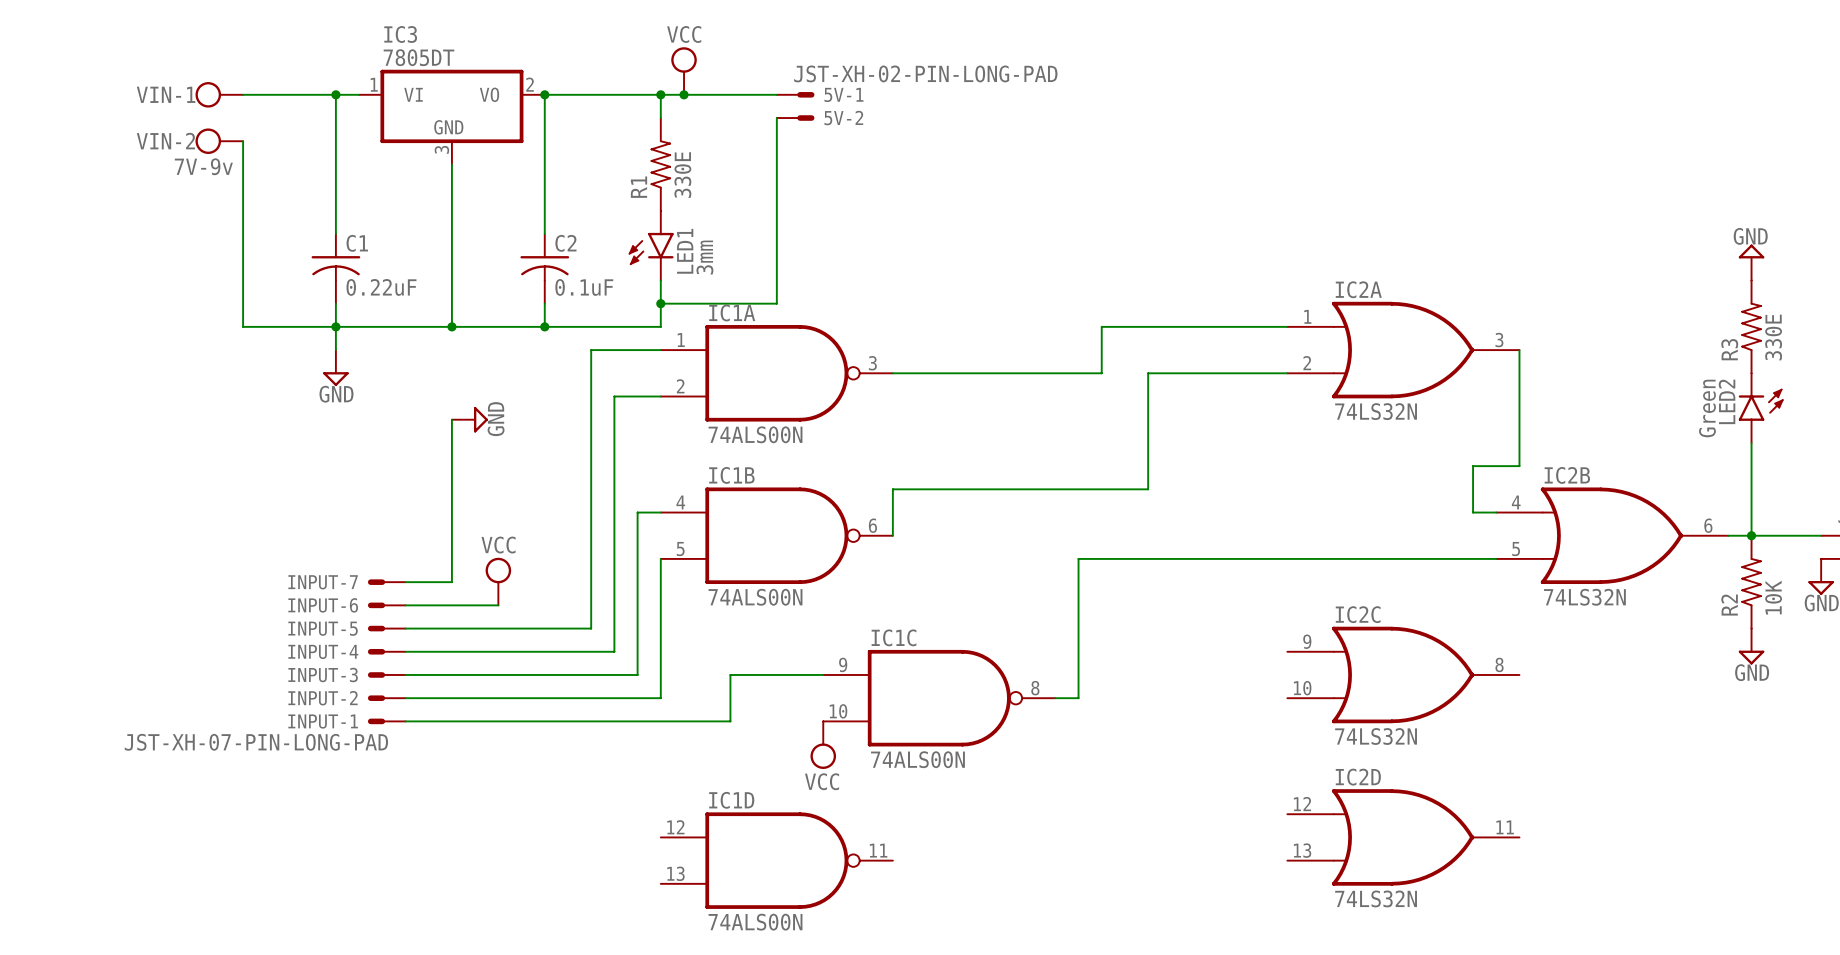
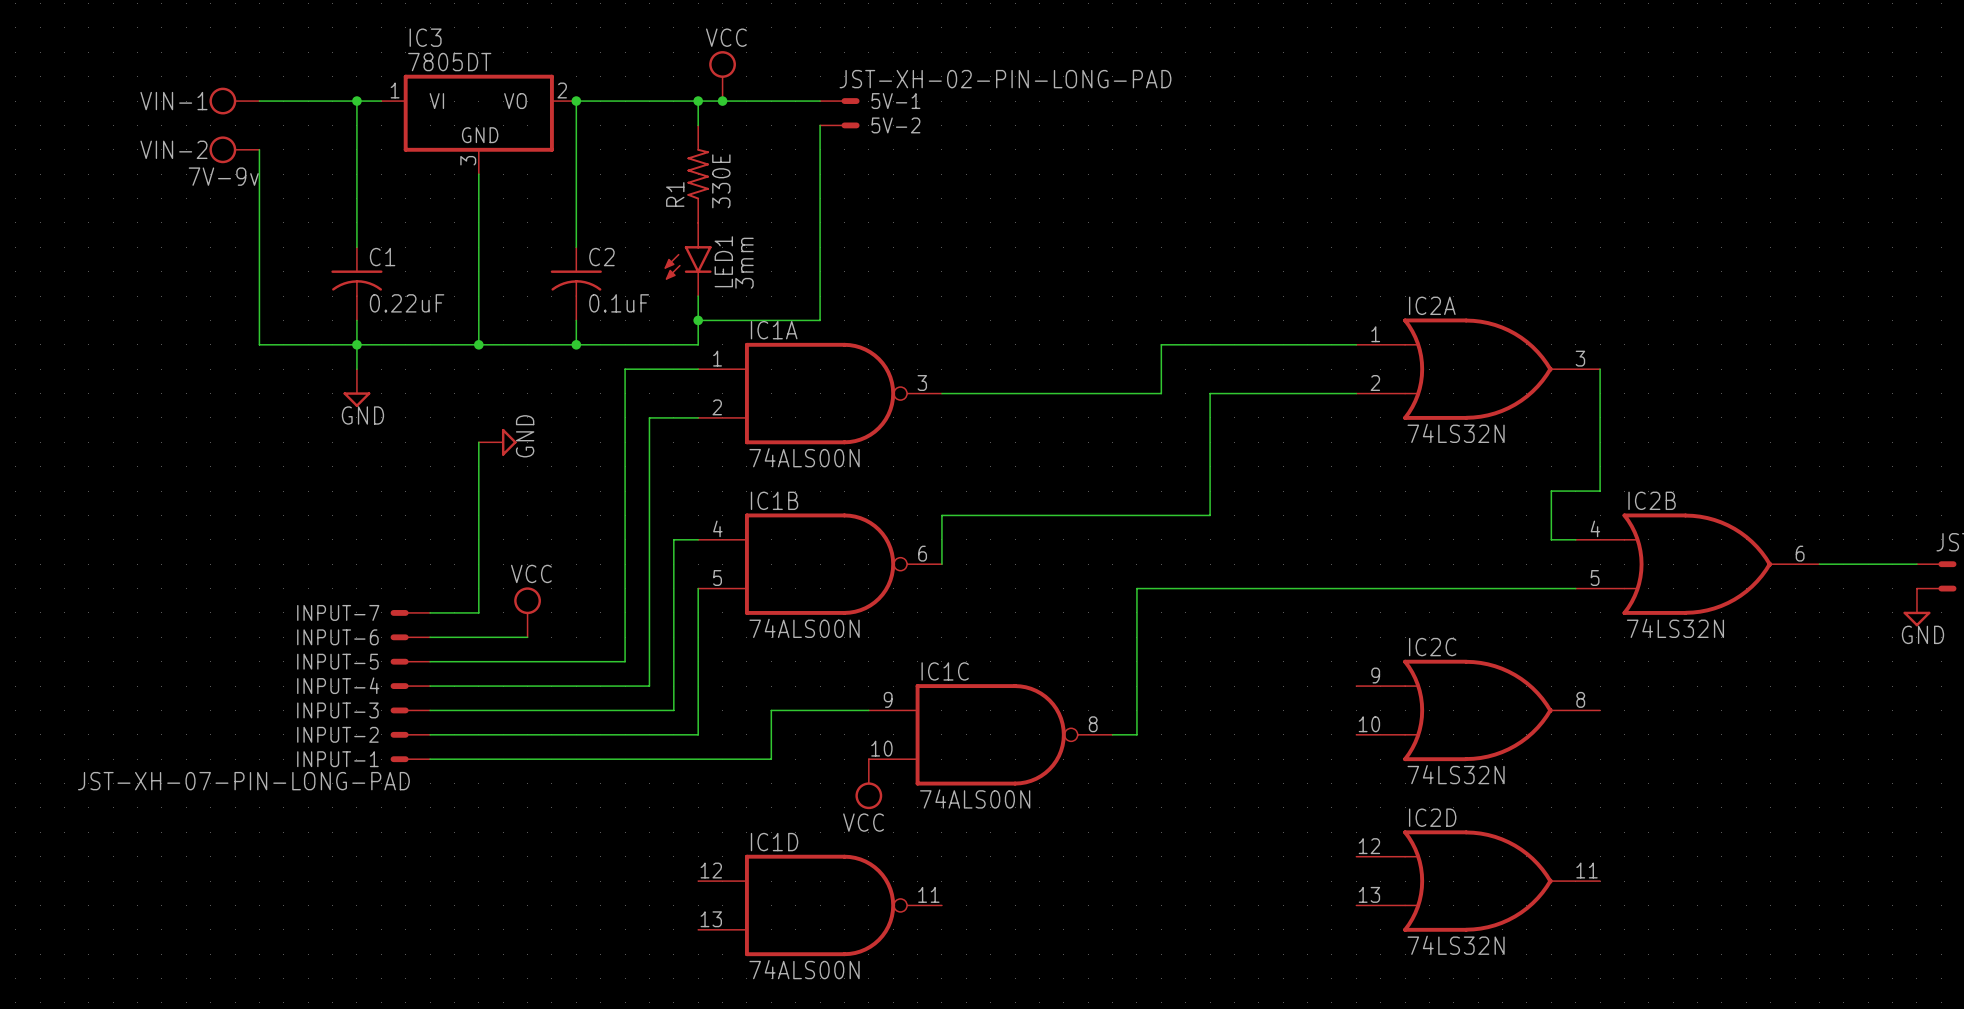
power symbol: GND (1751, 262) -> none
R3: 330E (1751, 326) -> none
LED2: Green (1761, 408) -> none
wire: (1751, 442) (1751, 535) -> none
junction: (1751, 535) -> none
R2: 10K (1751, 582) -> none
power symbol: GND (1751, 646) -> none

